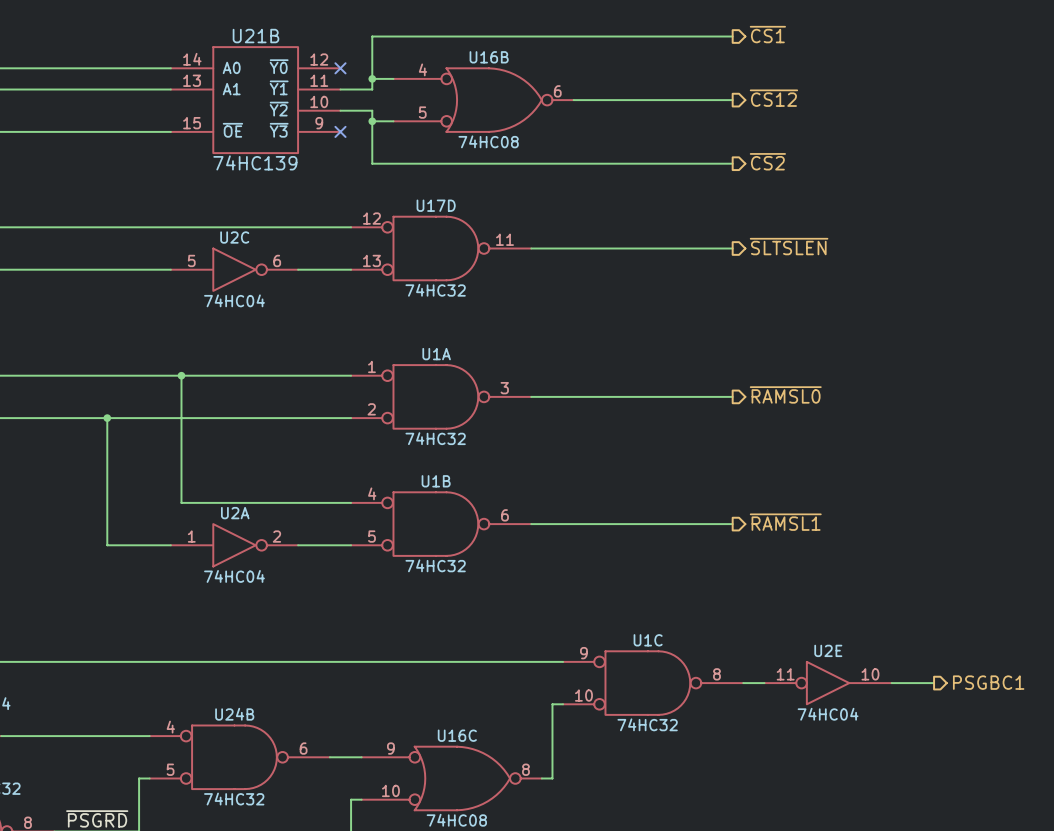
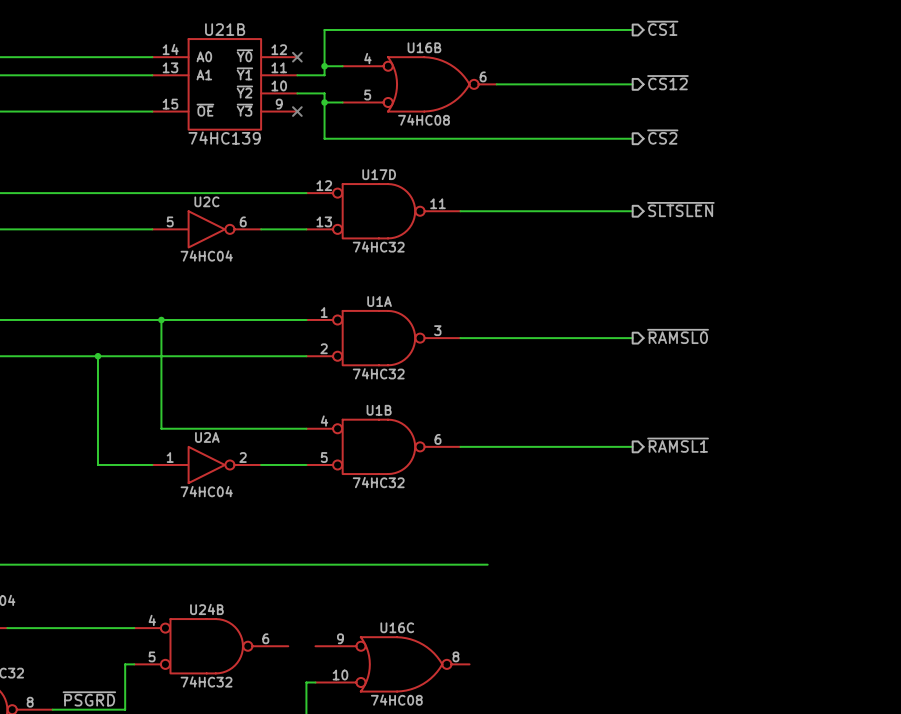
hierarchical label: PSGBC1 (988, 682) -> none
U1C: 74HC32 (653, 683) -> none
wire: (743, 683) (764, 683) -> none
U2E: 74HC04 (828, 683) -> none
wire: (891, 683) (934, 683) -> none
wire: (563, 704) (552, 704) (552, 778) (541, 778) -> none
wire: (329, 757) (361, 757) -> none

